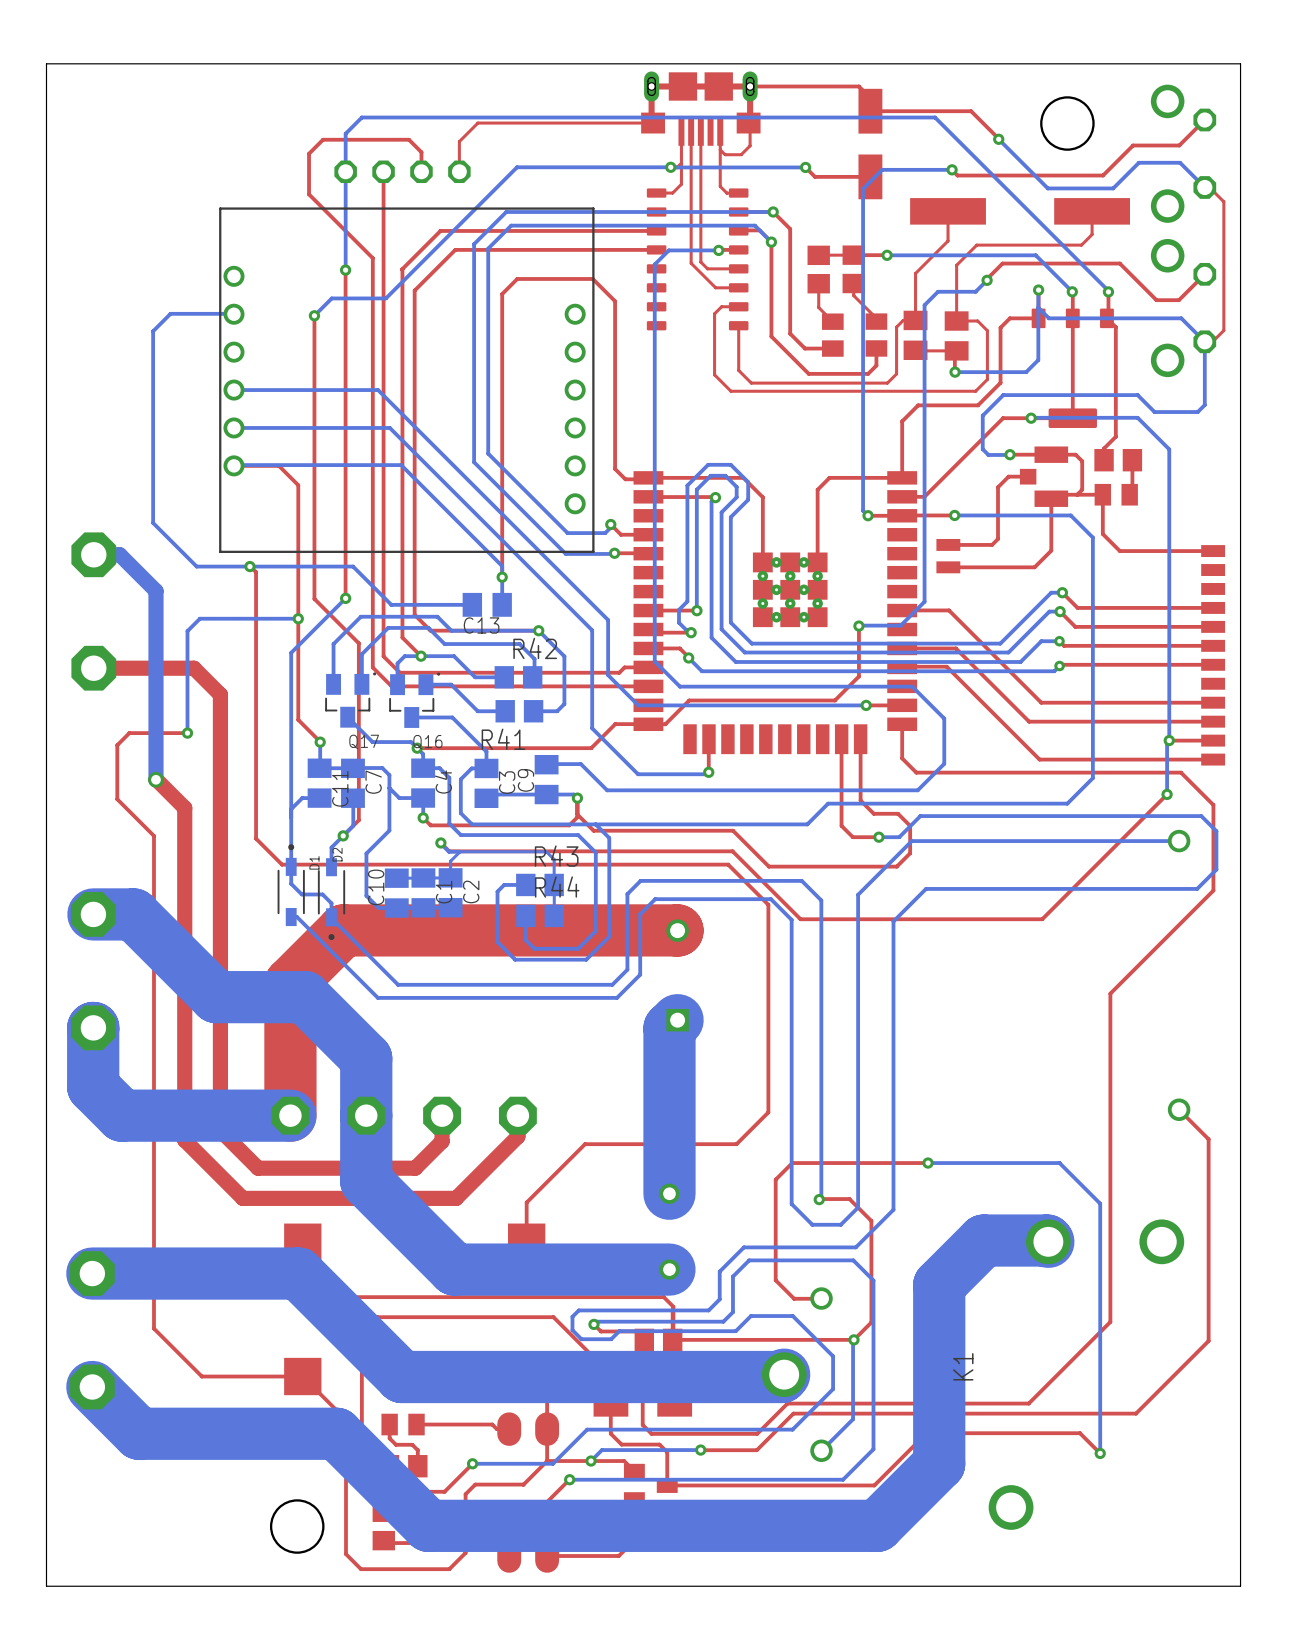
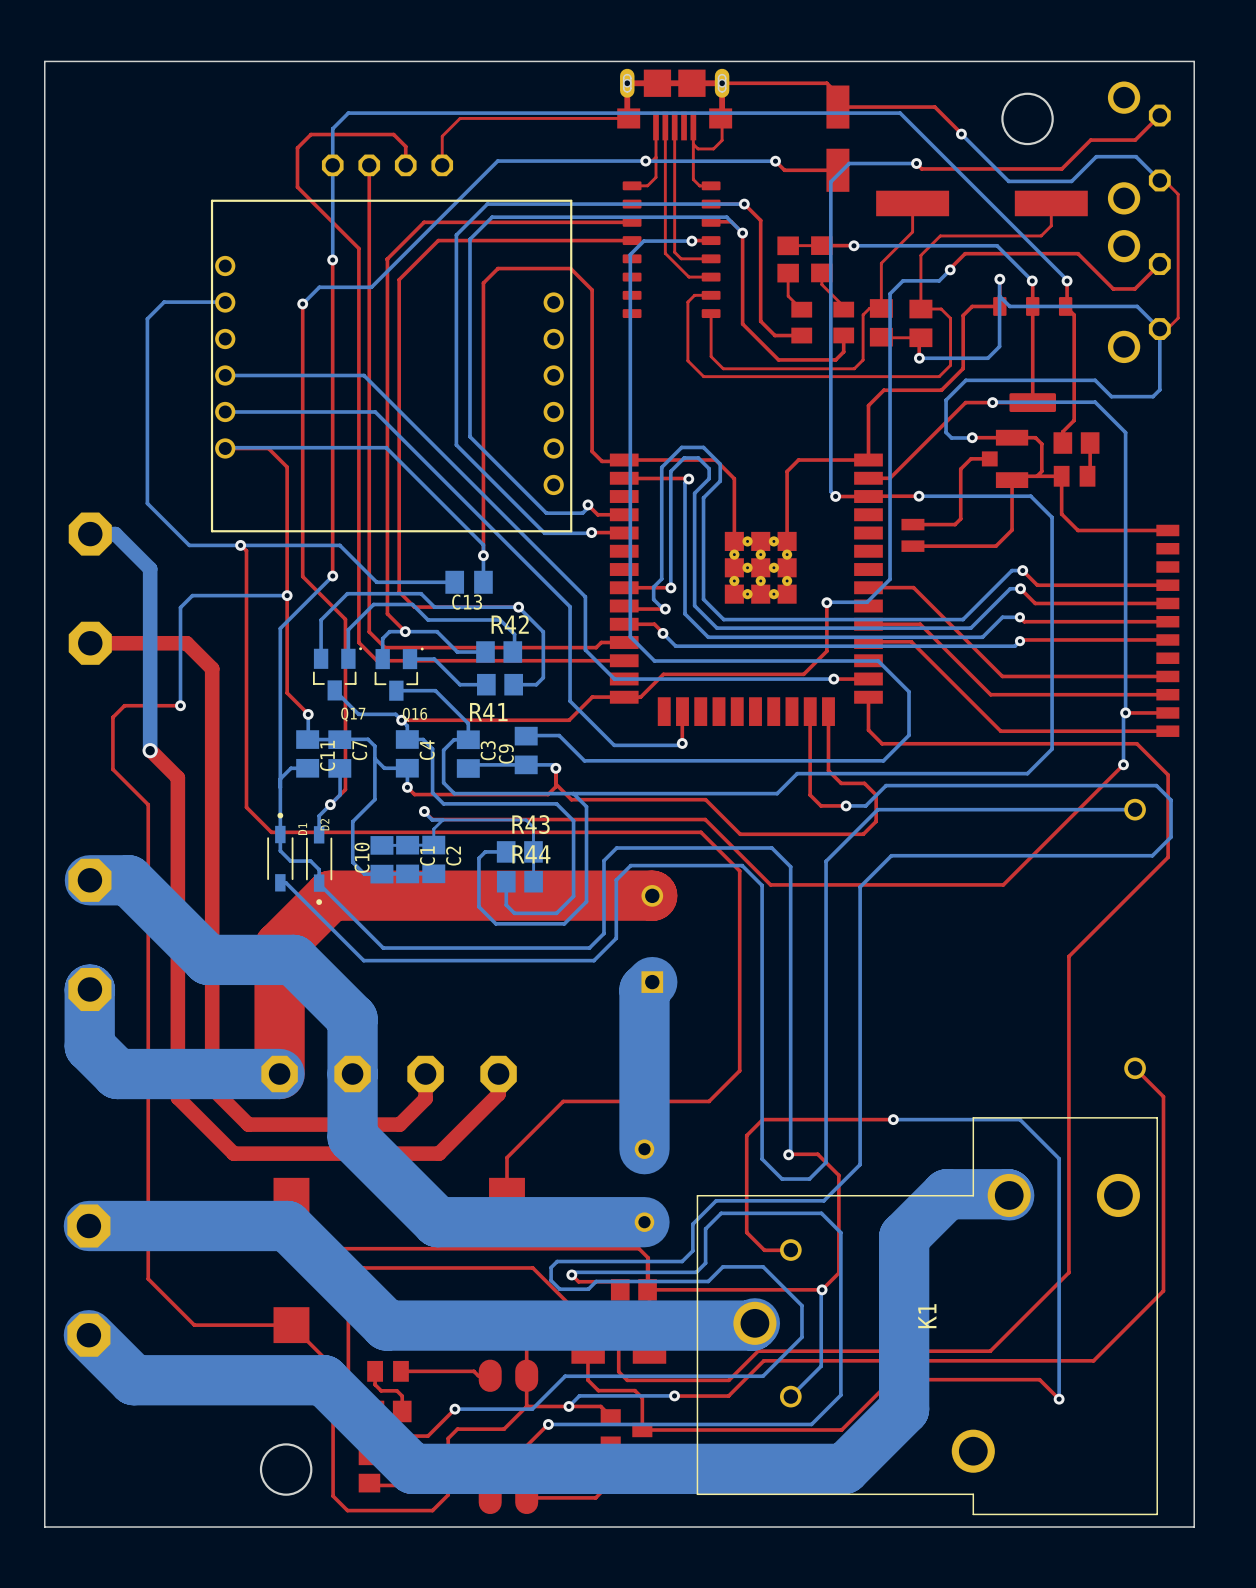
K1 footprint: [761, 1219, 1185, 1530] -> [696, 1117, 1158, 1516]

